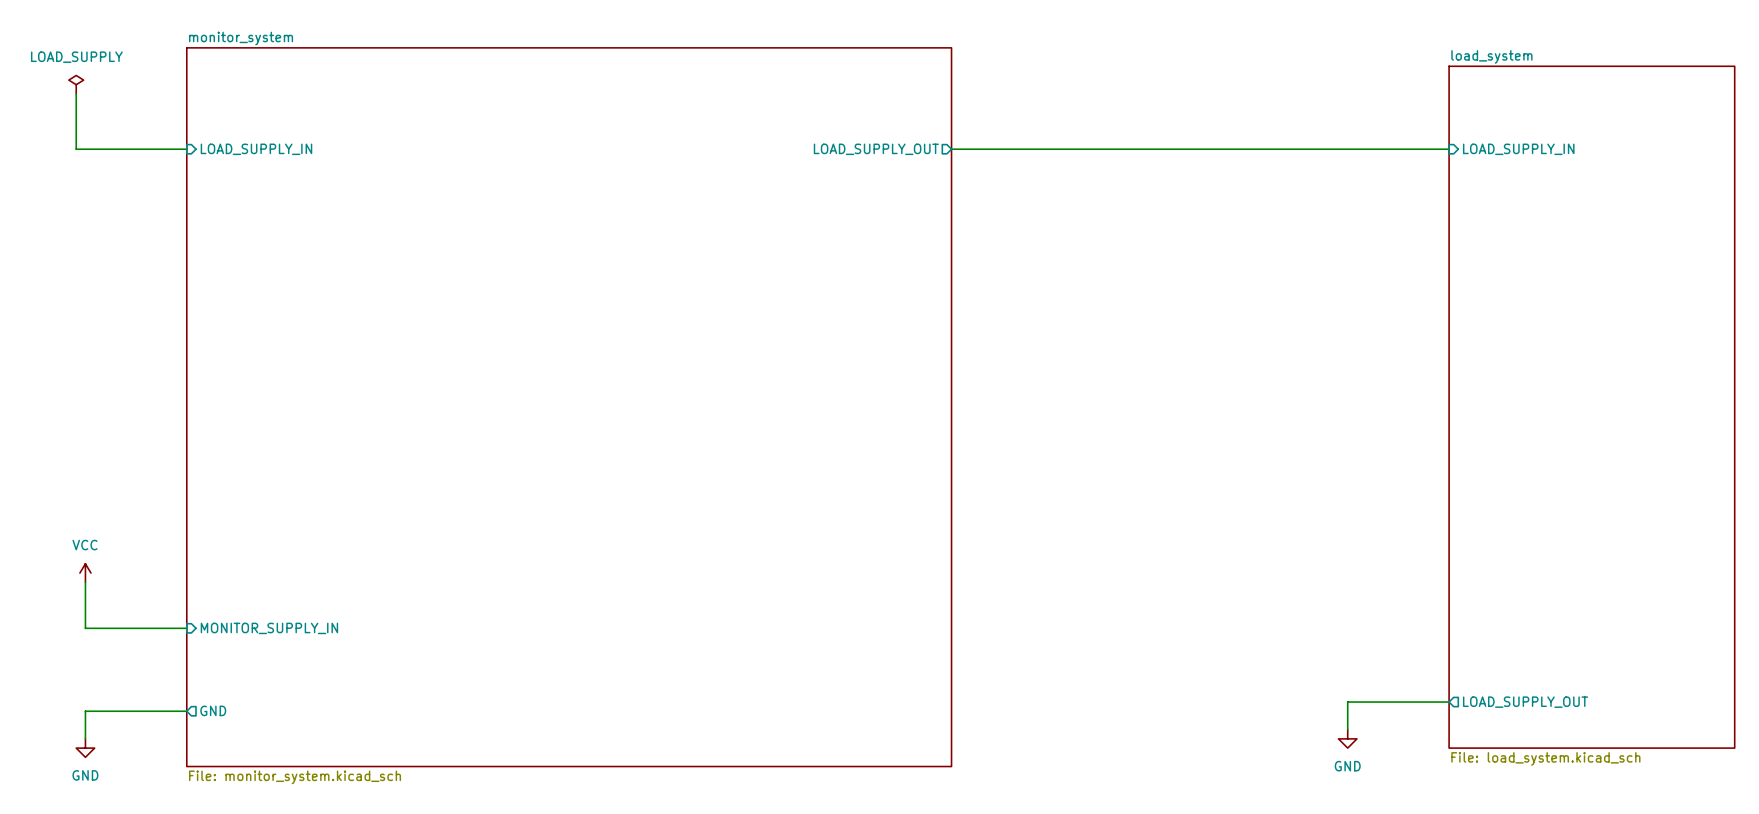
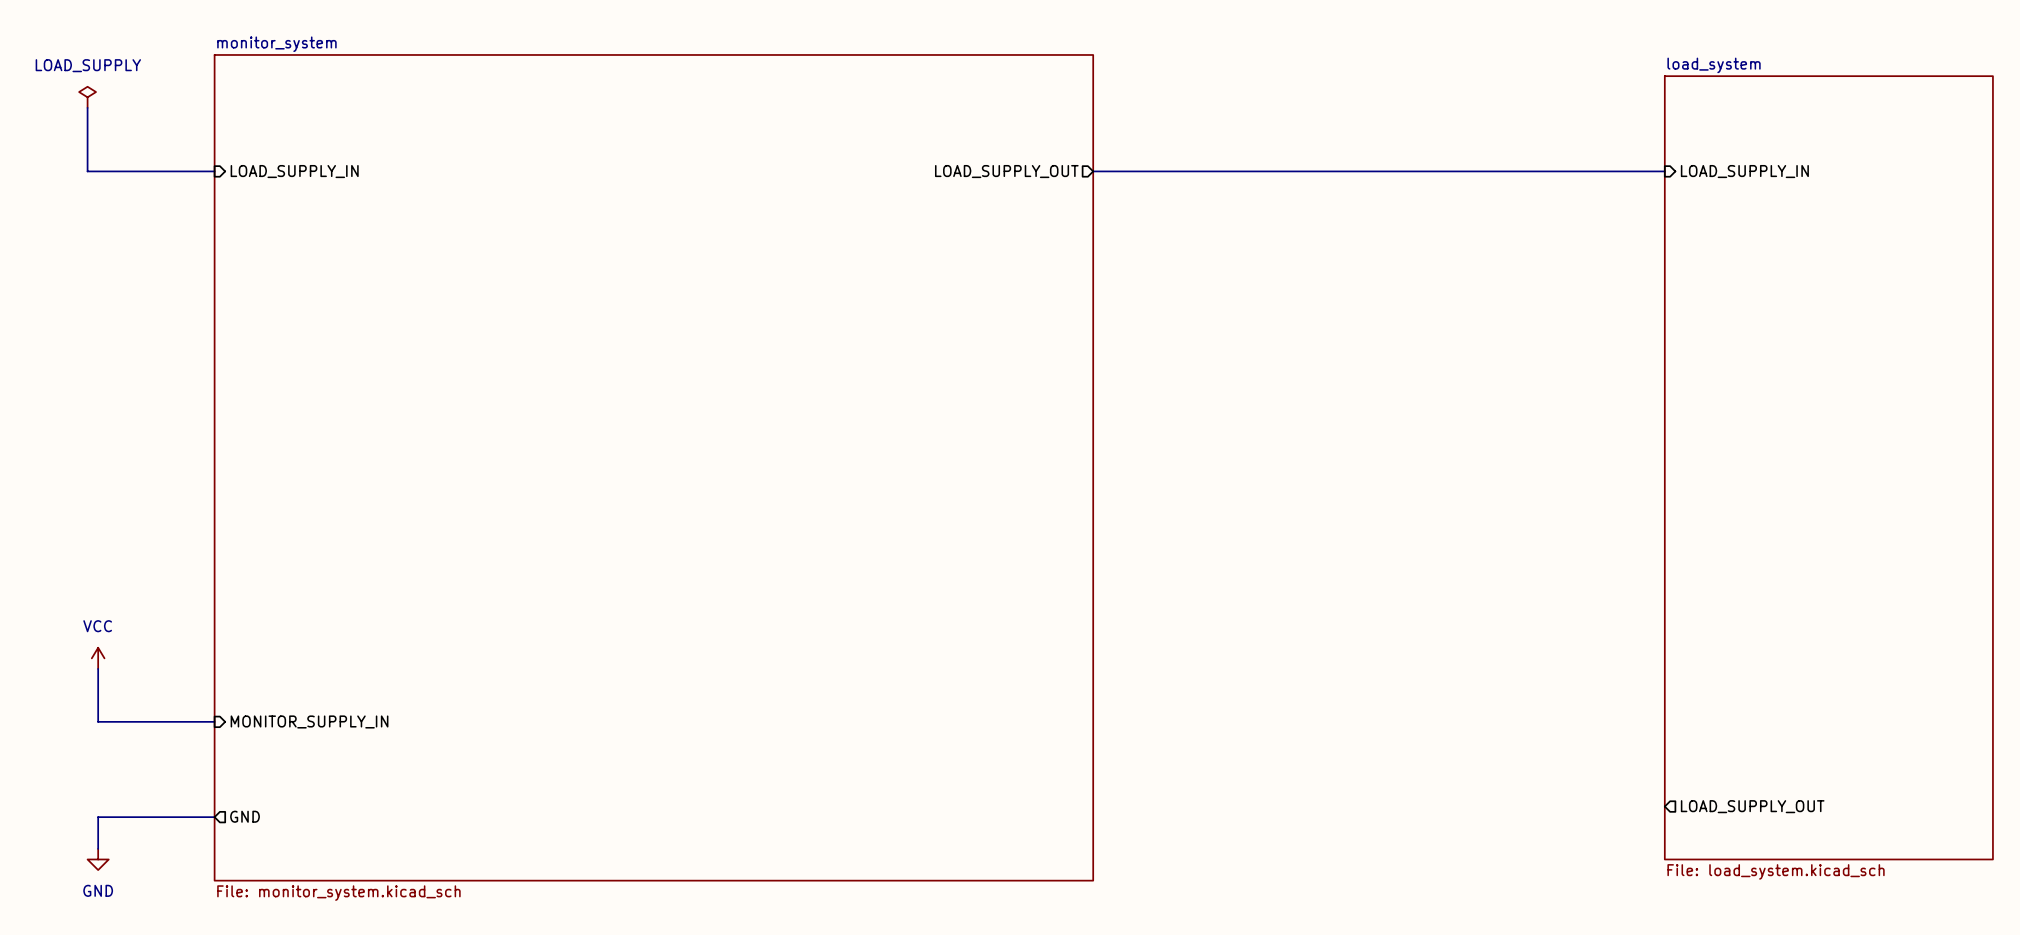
wire: (1449, 702) (1347, 702) (1347, 729) -> none
power symbol: GND (1347, 738) -> none

